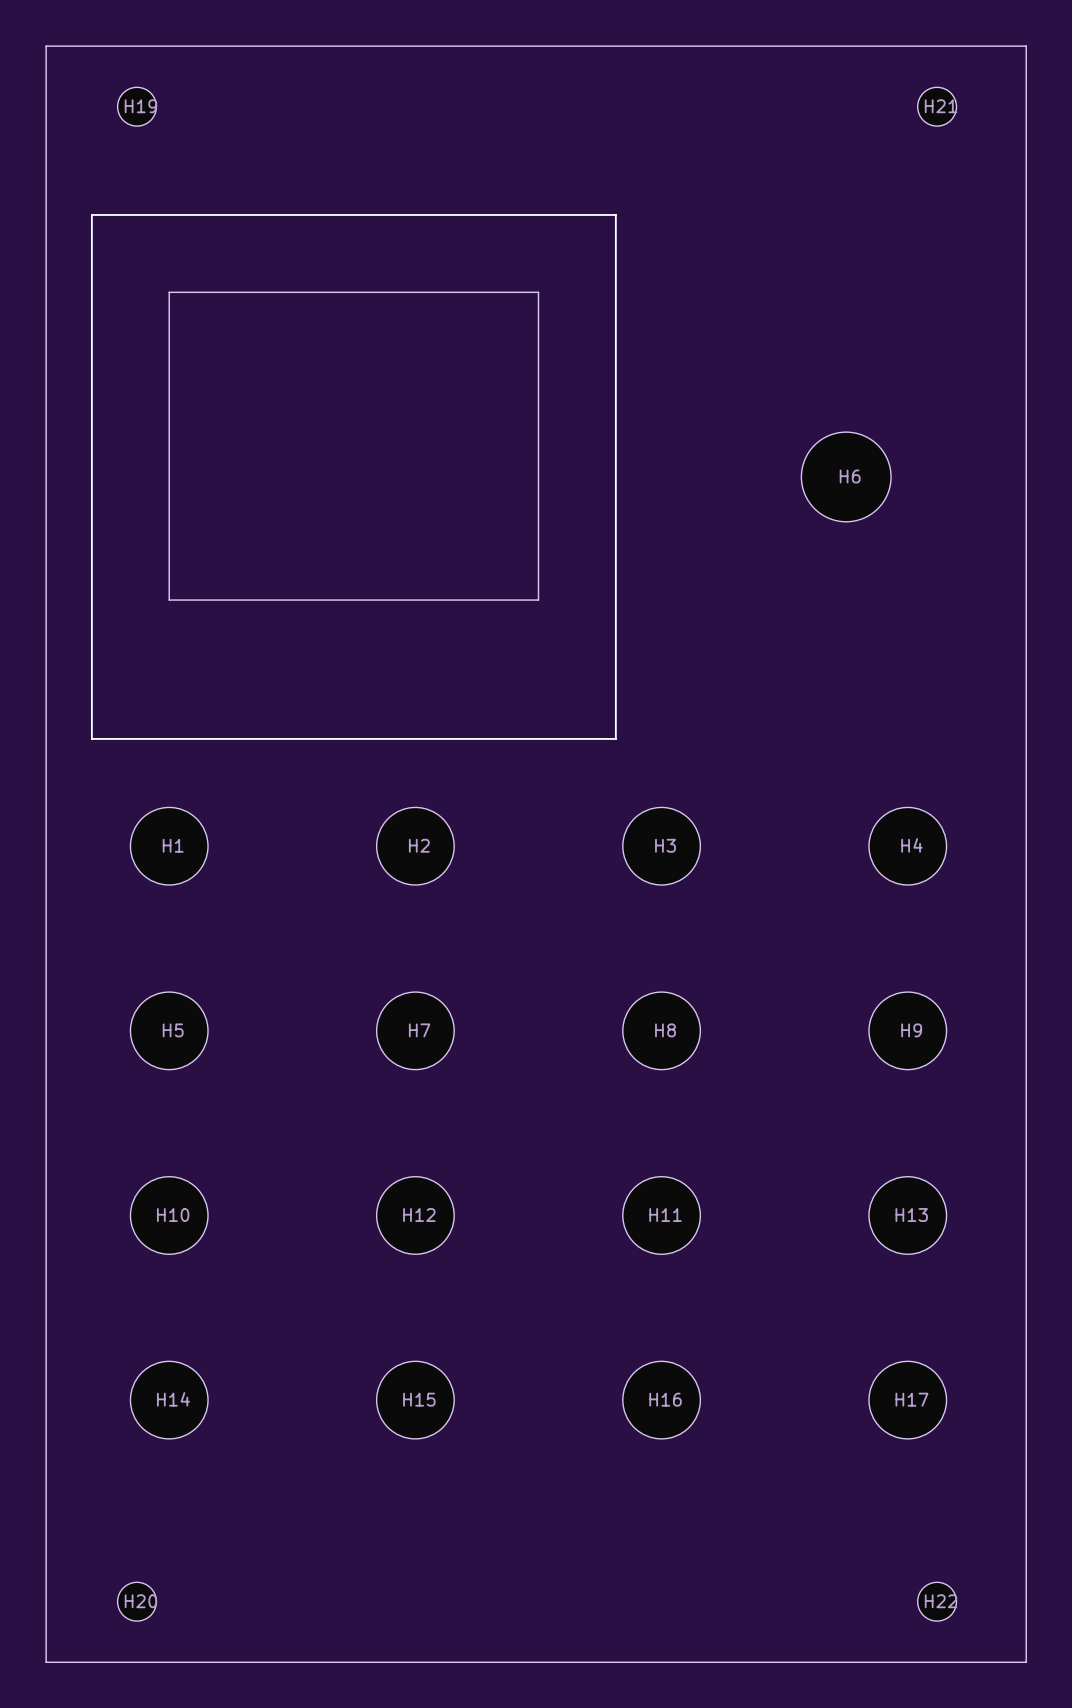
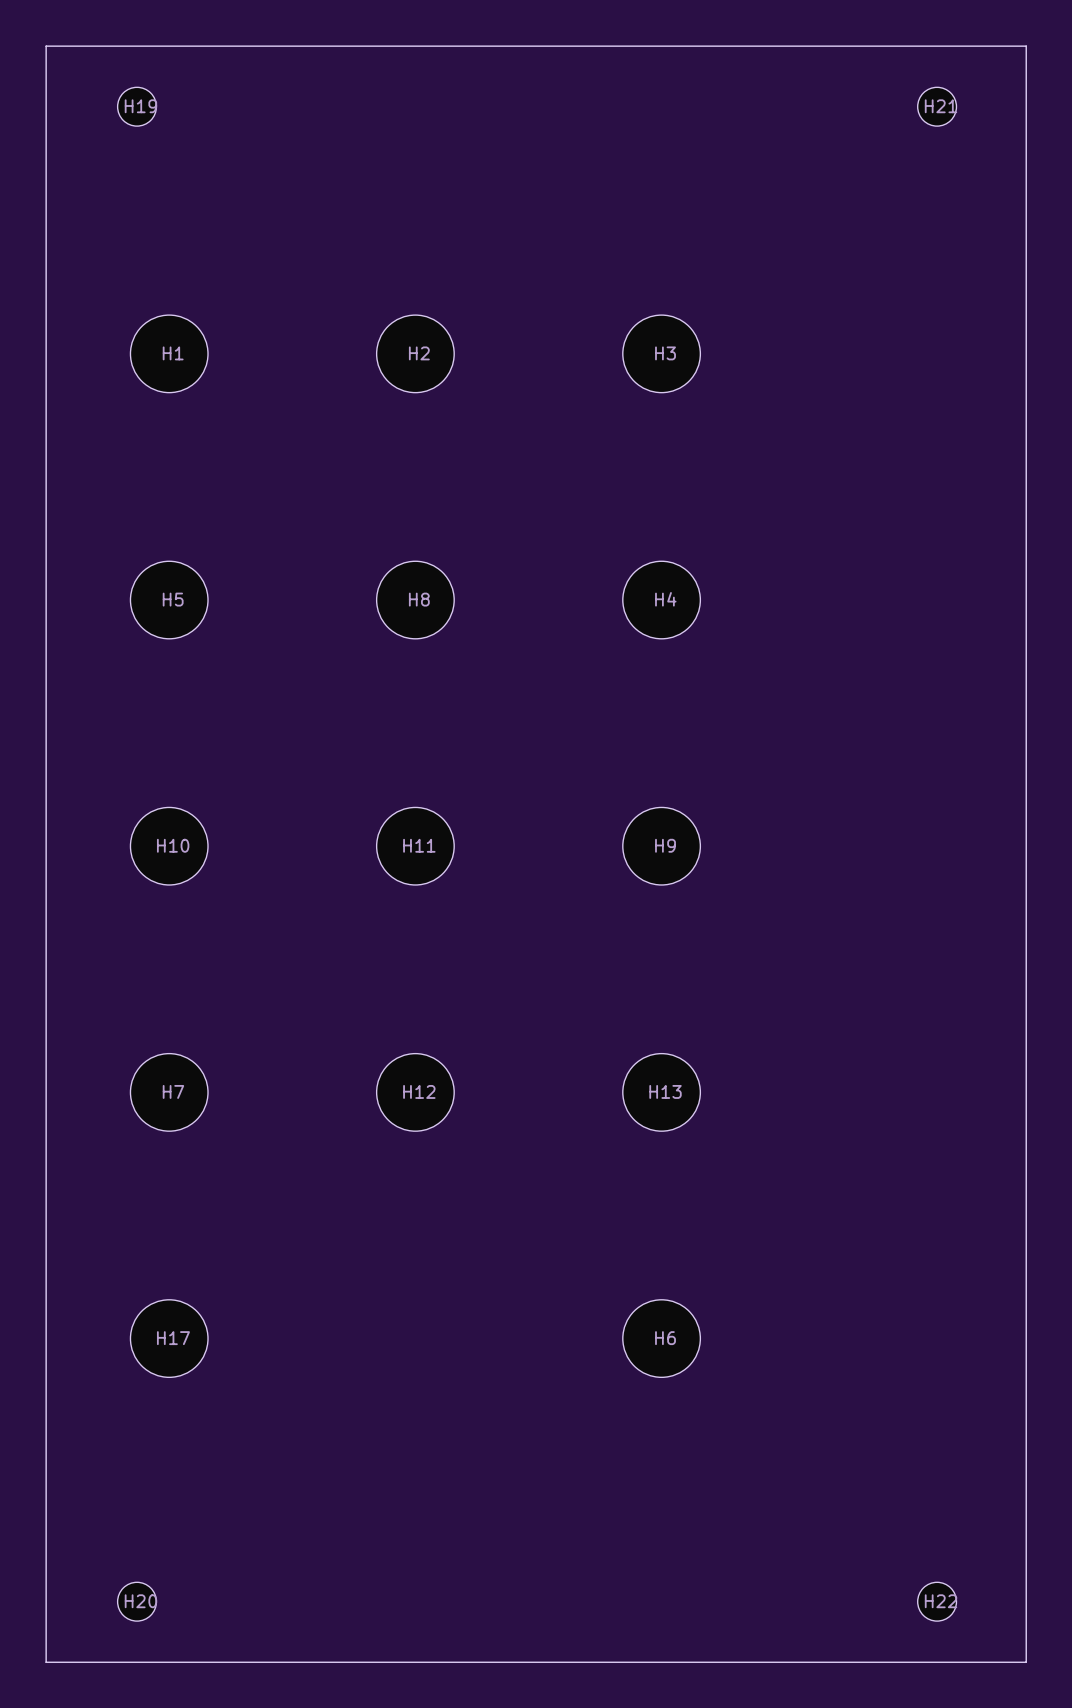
drawing: [90, 214, 617, 740] -> none
board edge: (169, 292) (169, 600) (538, 600) (538, 292) (169, 292) -> none
H1: none -> (169, 353)
H2: none -> (415, 353)
H3: none -> (661, 353)
H6 footprint: [801, 432, 892, 522] -> [622, 1299, 701, 1378]
H1 name: H1 (173, 845) -> H10 (173, 845)
H2 name: H2 (419, 845) -> H11 (419, 845)
H3 name: H3 (665, 845) -> H9 (665, 845)
H4 position: (907, 846) -> (661, 600)
H5 position: (169, 1030) -> (169, 600)
H7 position: (415, 1030) -> (169, 1092)
H8 position: (661, 1030) -> (415, 600)
H9: (907, 1030) -> none
H10: (169, 1215) -> none
H12 position: (415, 1215) -> (415, 1092)
H11: (661, 1215) -> none
H13 position: (907, 1215) -> (661, 1092)
H14: (169, 1400) -> none
H15: (415, 1400) -> none
H16: (661, 1400) -> none
H17 position: (907, 1400) -> (169, 1338)

